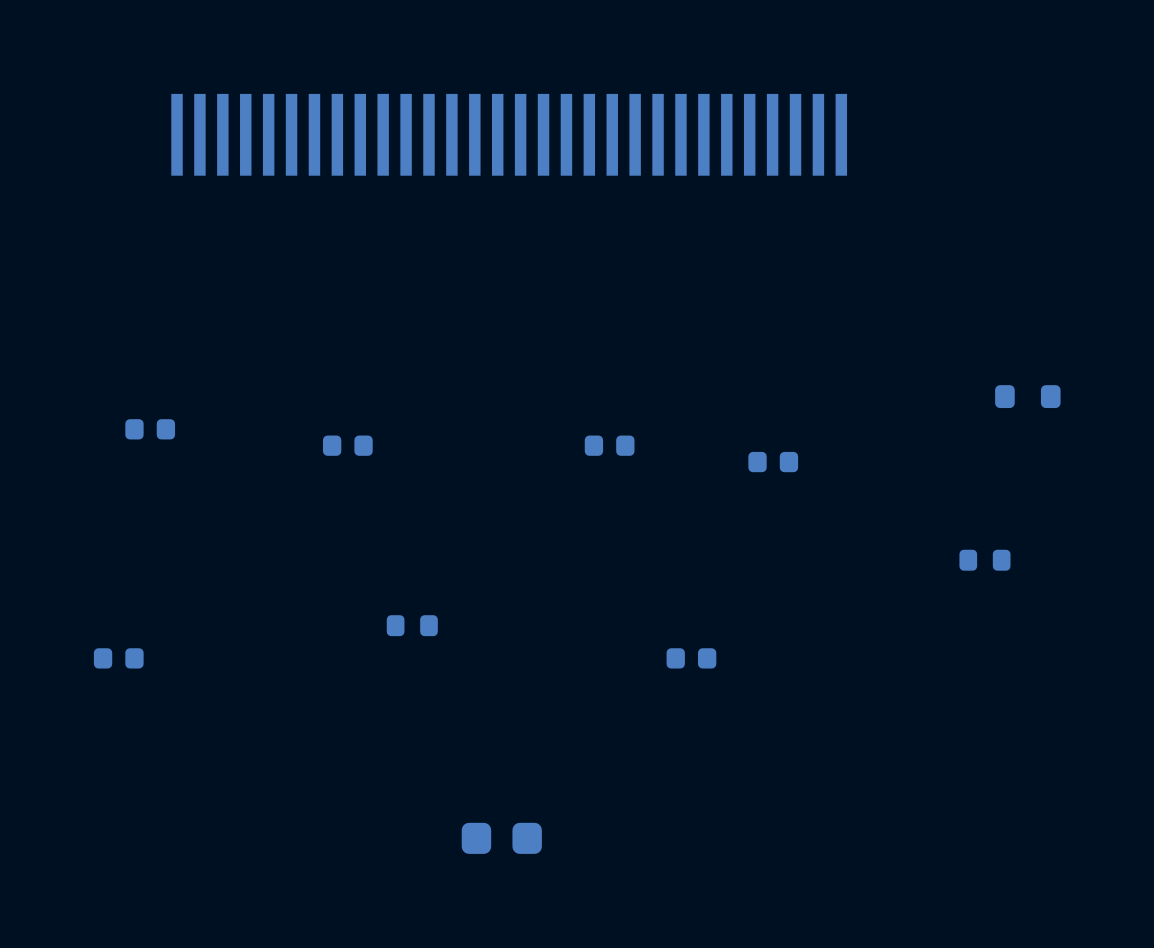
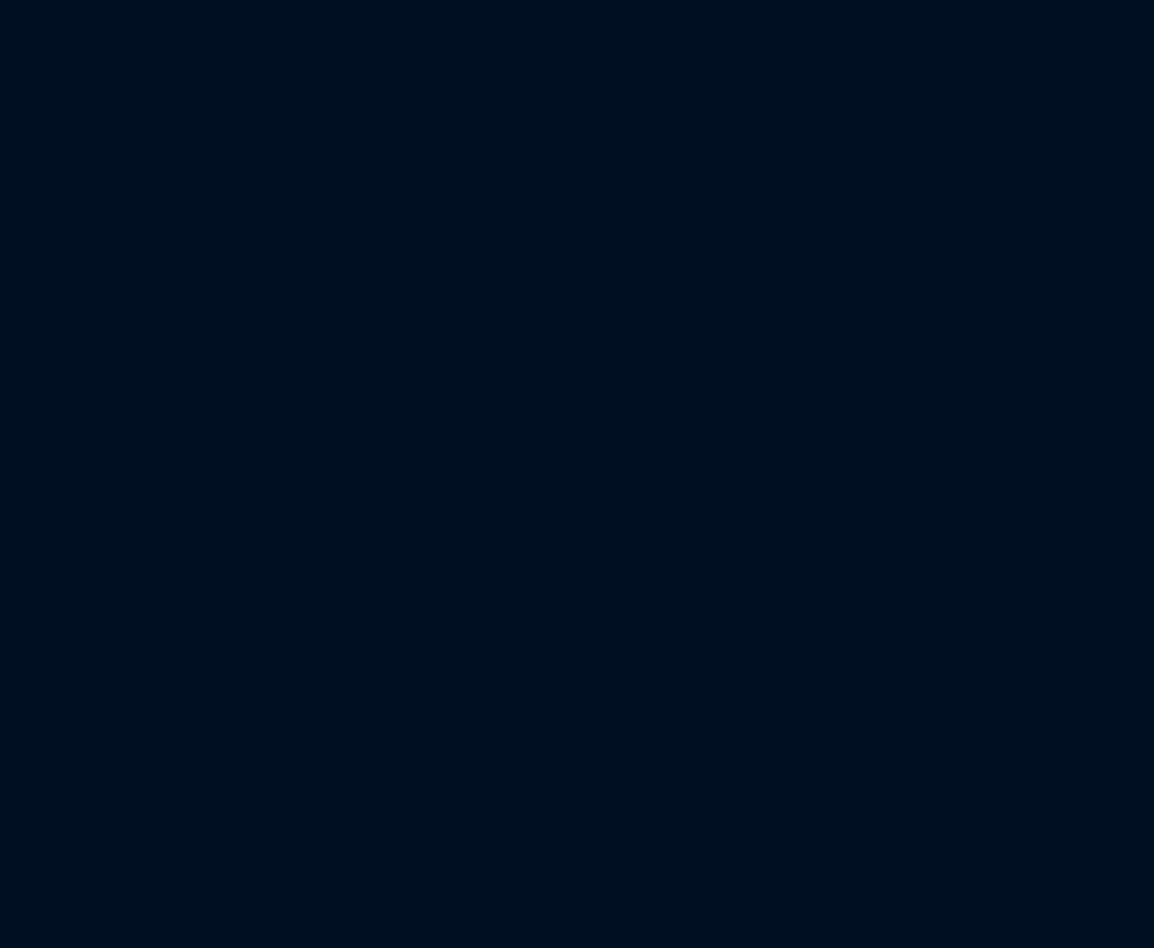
part: (509, 134) -> none
part: (1027, 396) -> none
part: (150, 429) -> none
part: (347, 445) -> none
part: (609, 445) -> none
part: (773, 462) -> none
part: (984, 560) -> none
part: (412, 625) -> none
part: (118, 658) -> none
part: (691, 658) -> none
part: (501, 838) -> none

